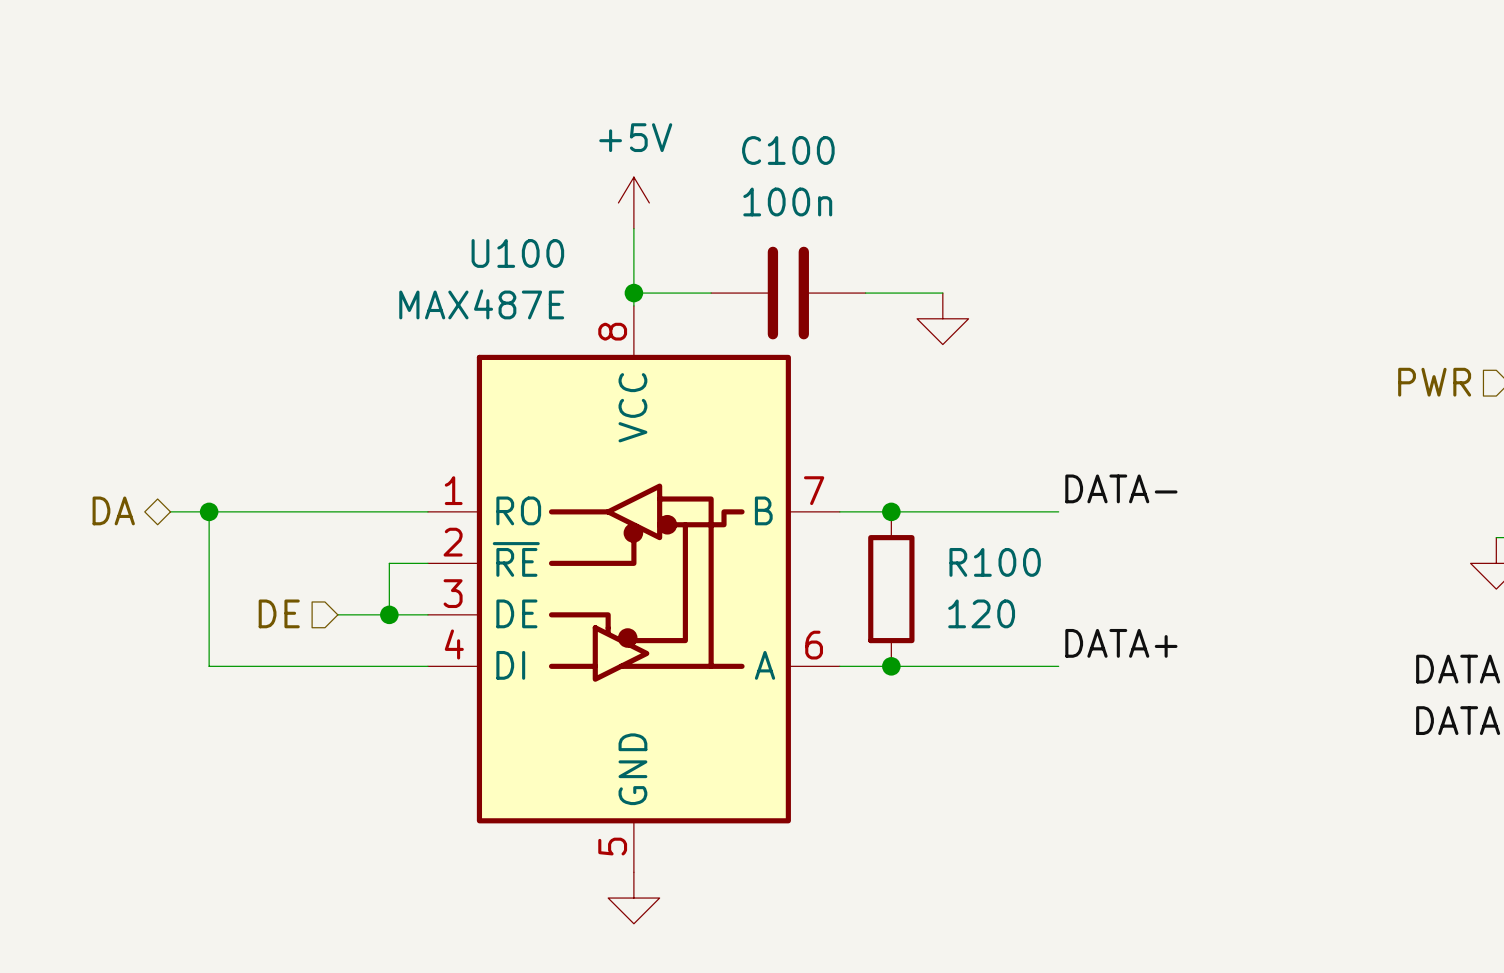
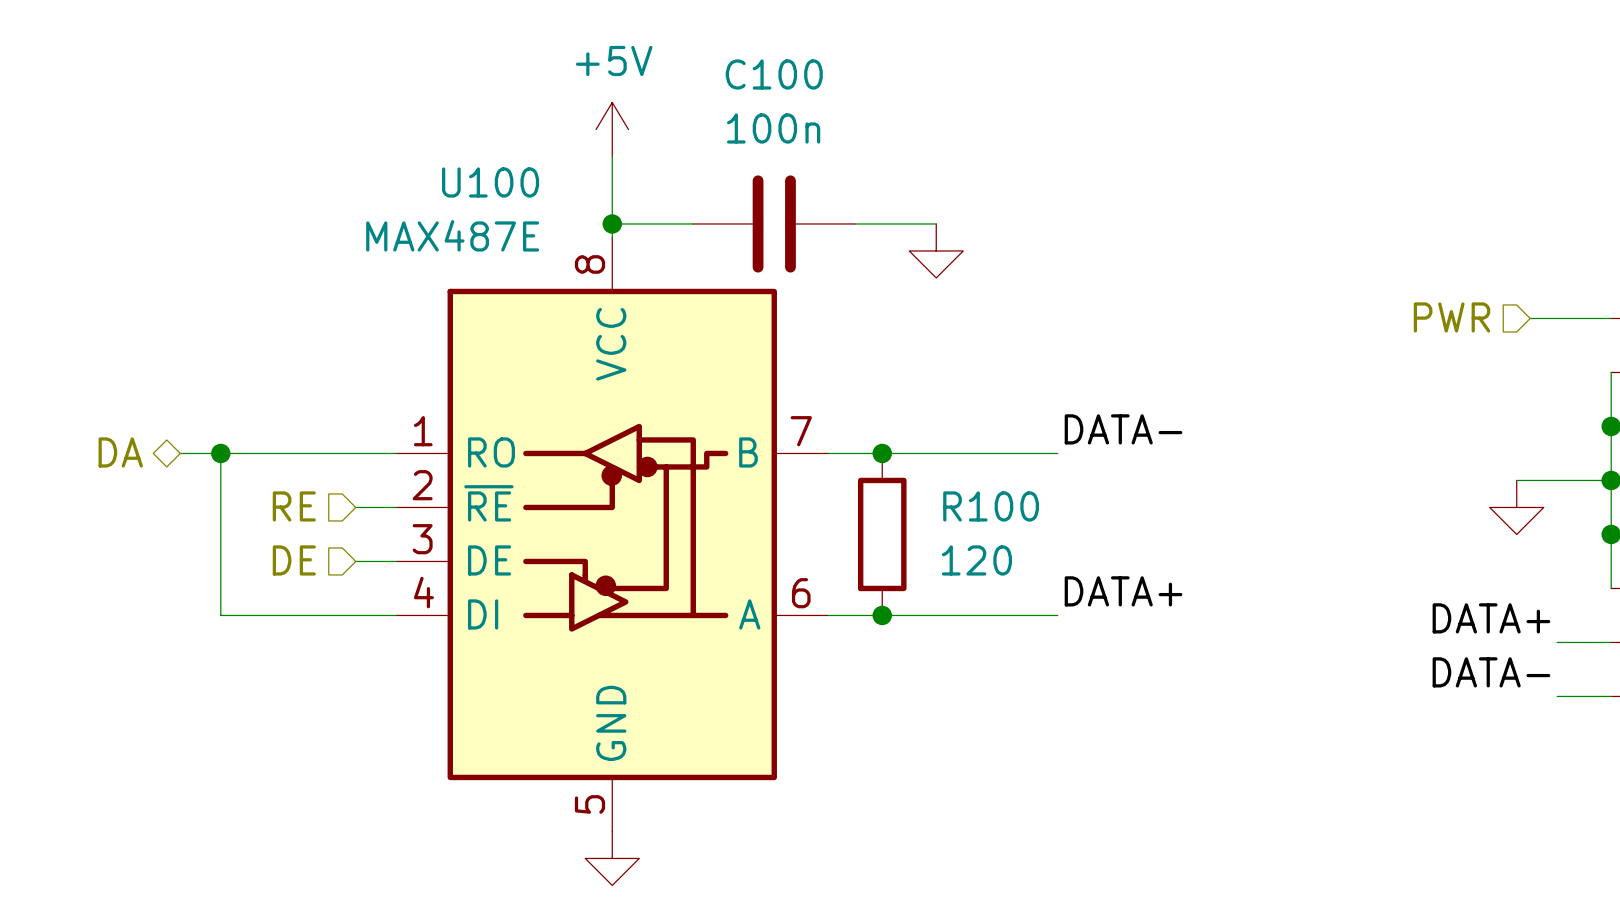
hierarchical label position: DA (113, 510) -> DA (120, 452)
wire: (170, 511) (222, 511) -> none
wire: (209, 511) (209, 666) (260, 666) -> (220, 453) (220, 615)
junction position: (209, 511) -> (220, 453)
hierarchical label: none -> RE (294, 506)
wire: (389, 563) (389, 614) (337, 614) -> none
hierarchical label position: DE (279, 613) -> DE (294, 560)
junction: (389, 614) -> none

